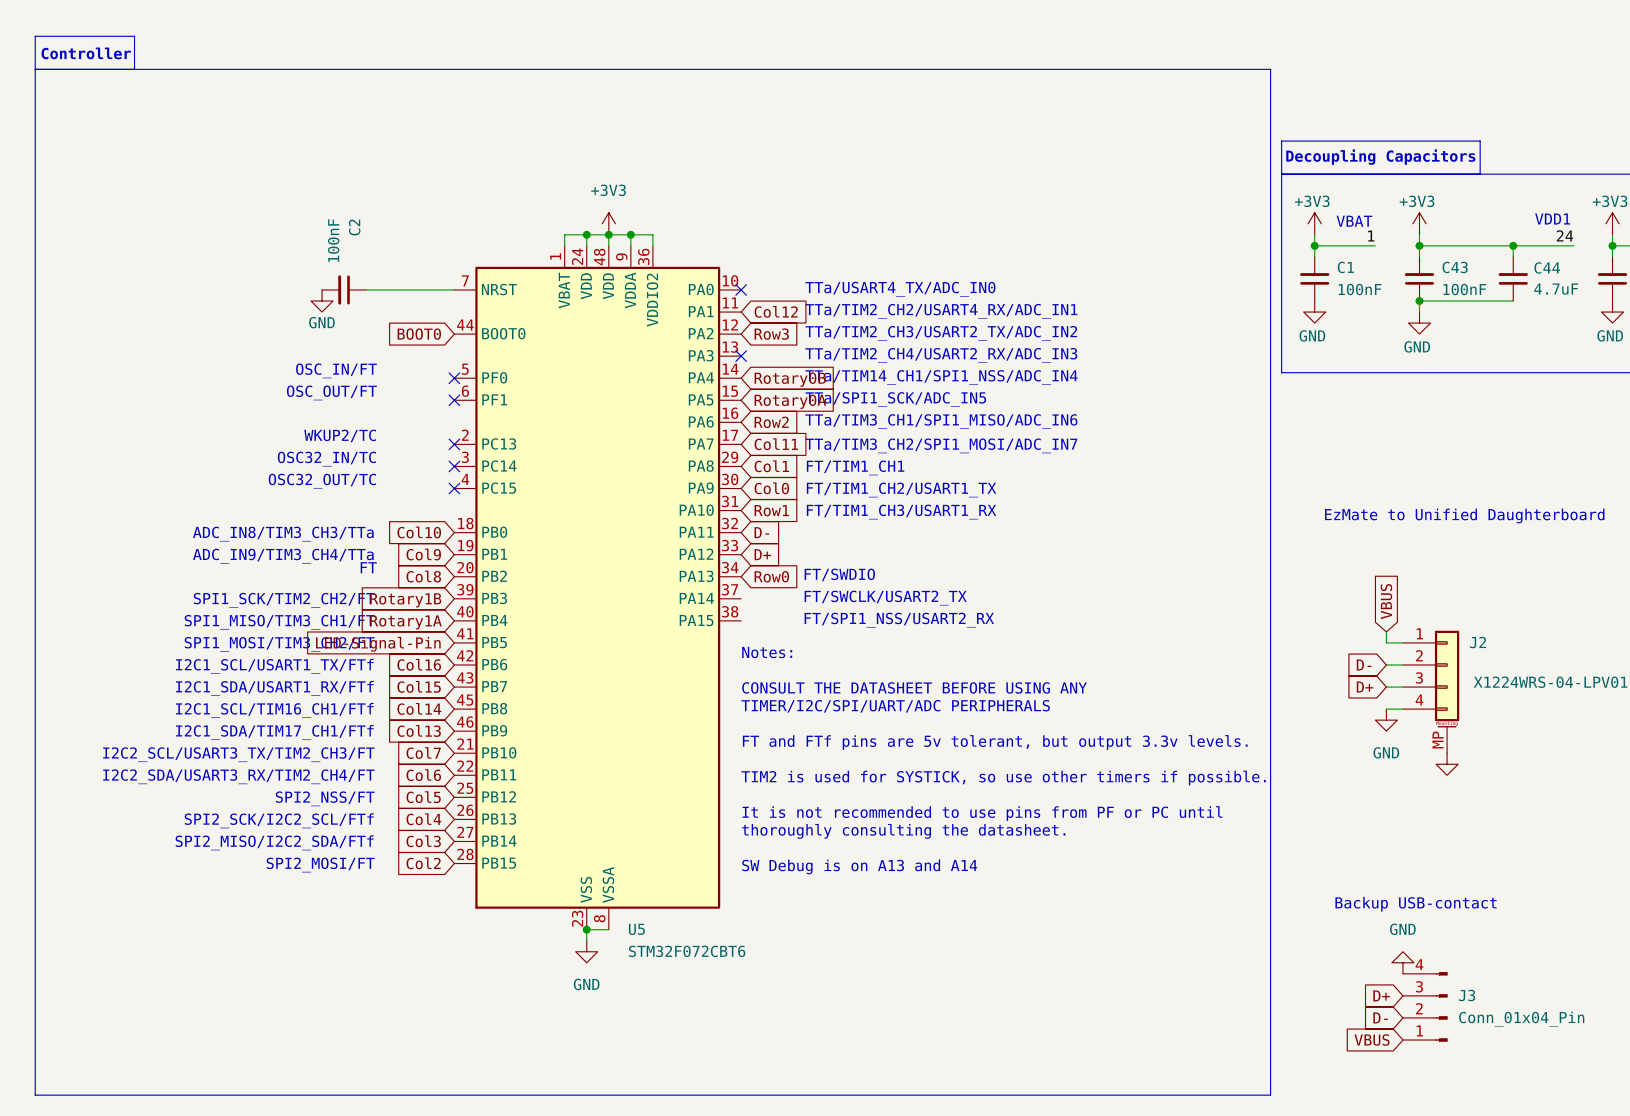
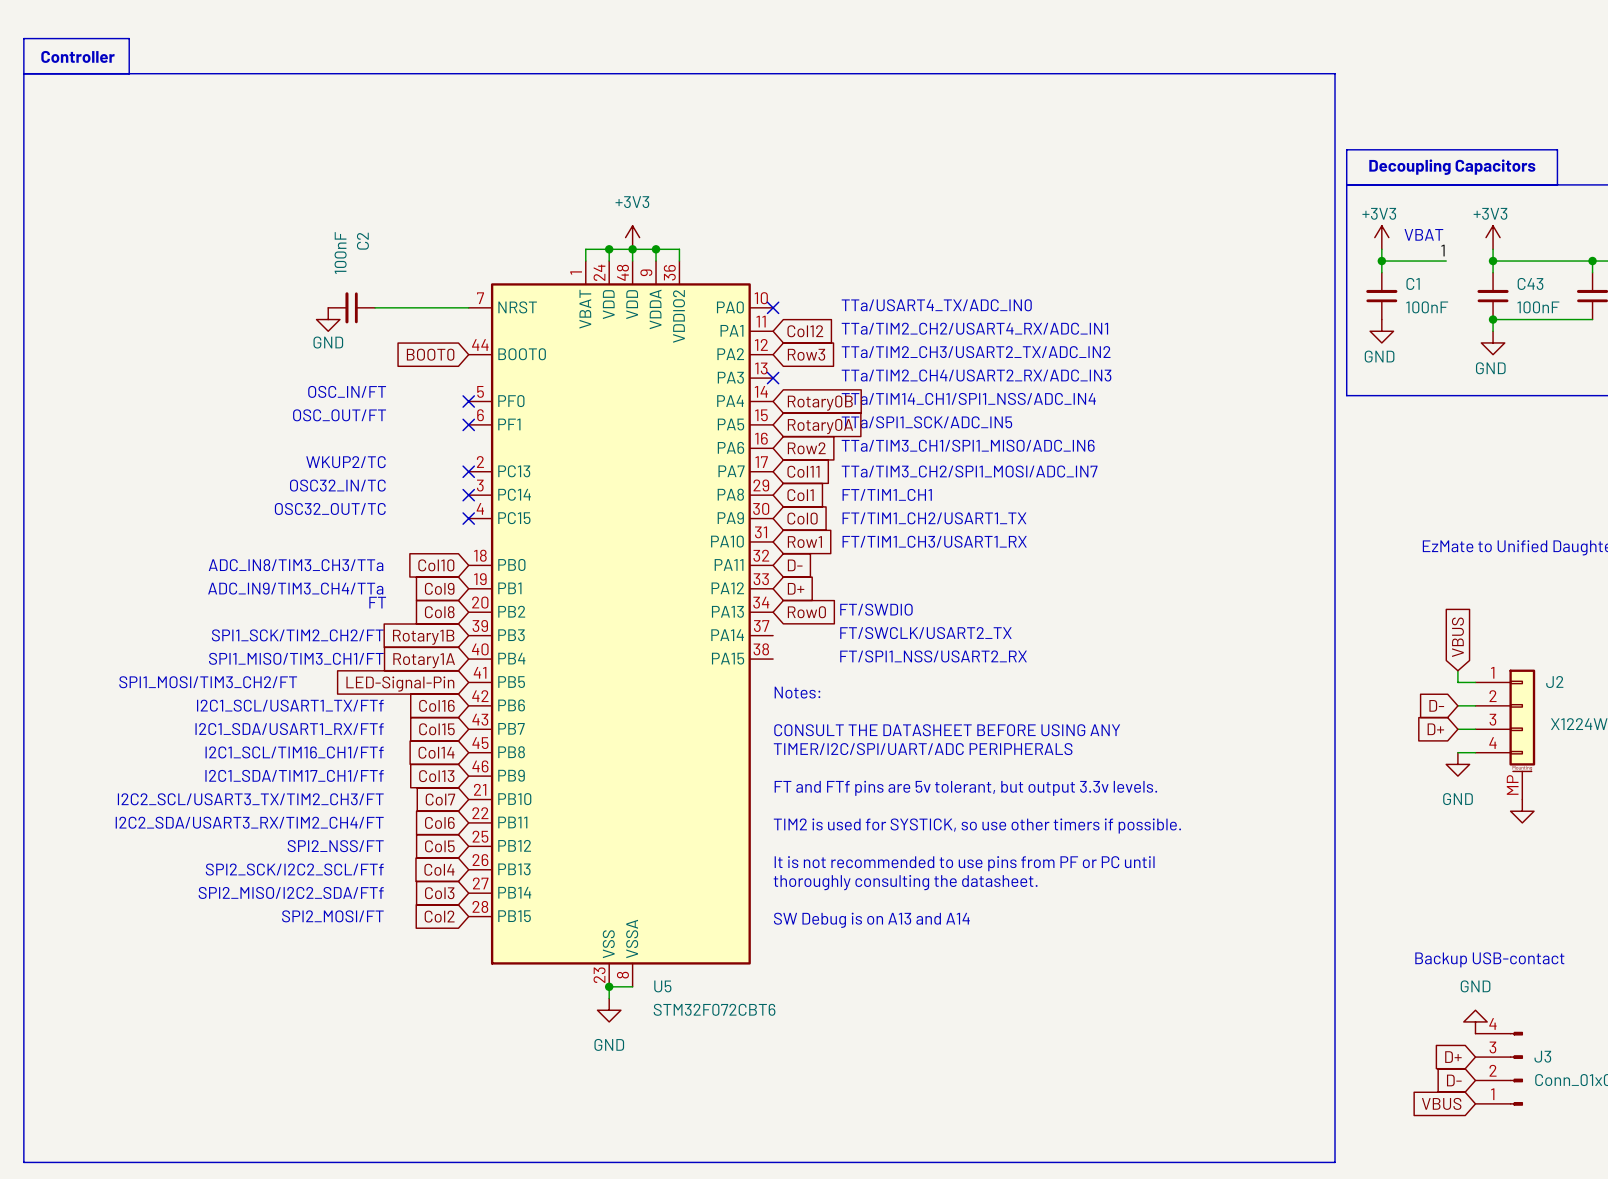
text position: SPI1_MOSI/TIM3_CH2/FT (279, 644) -> SPI1_MOSI/TIM3_CH2/FT (208, 682)

